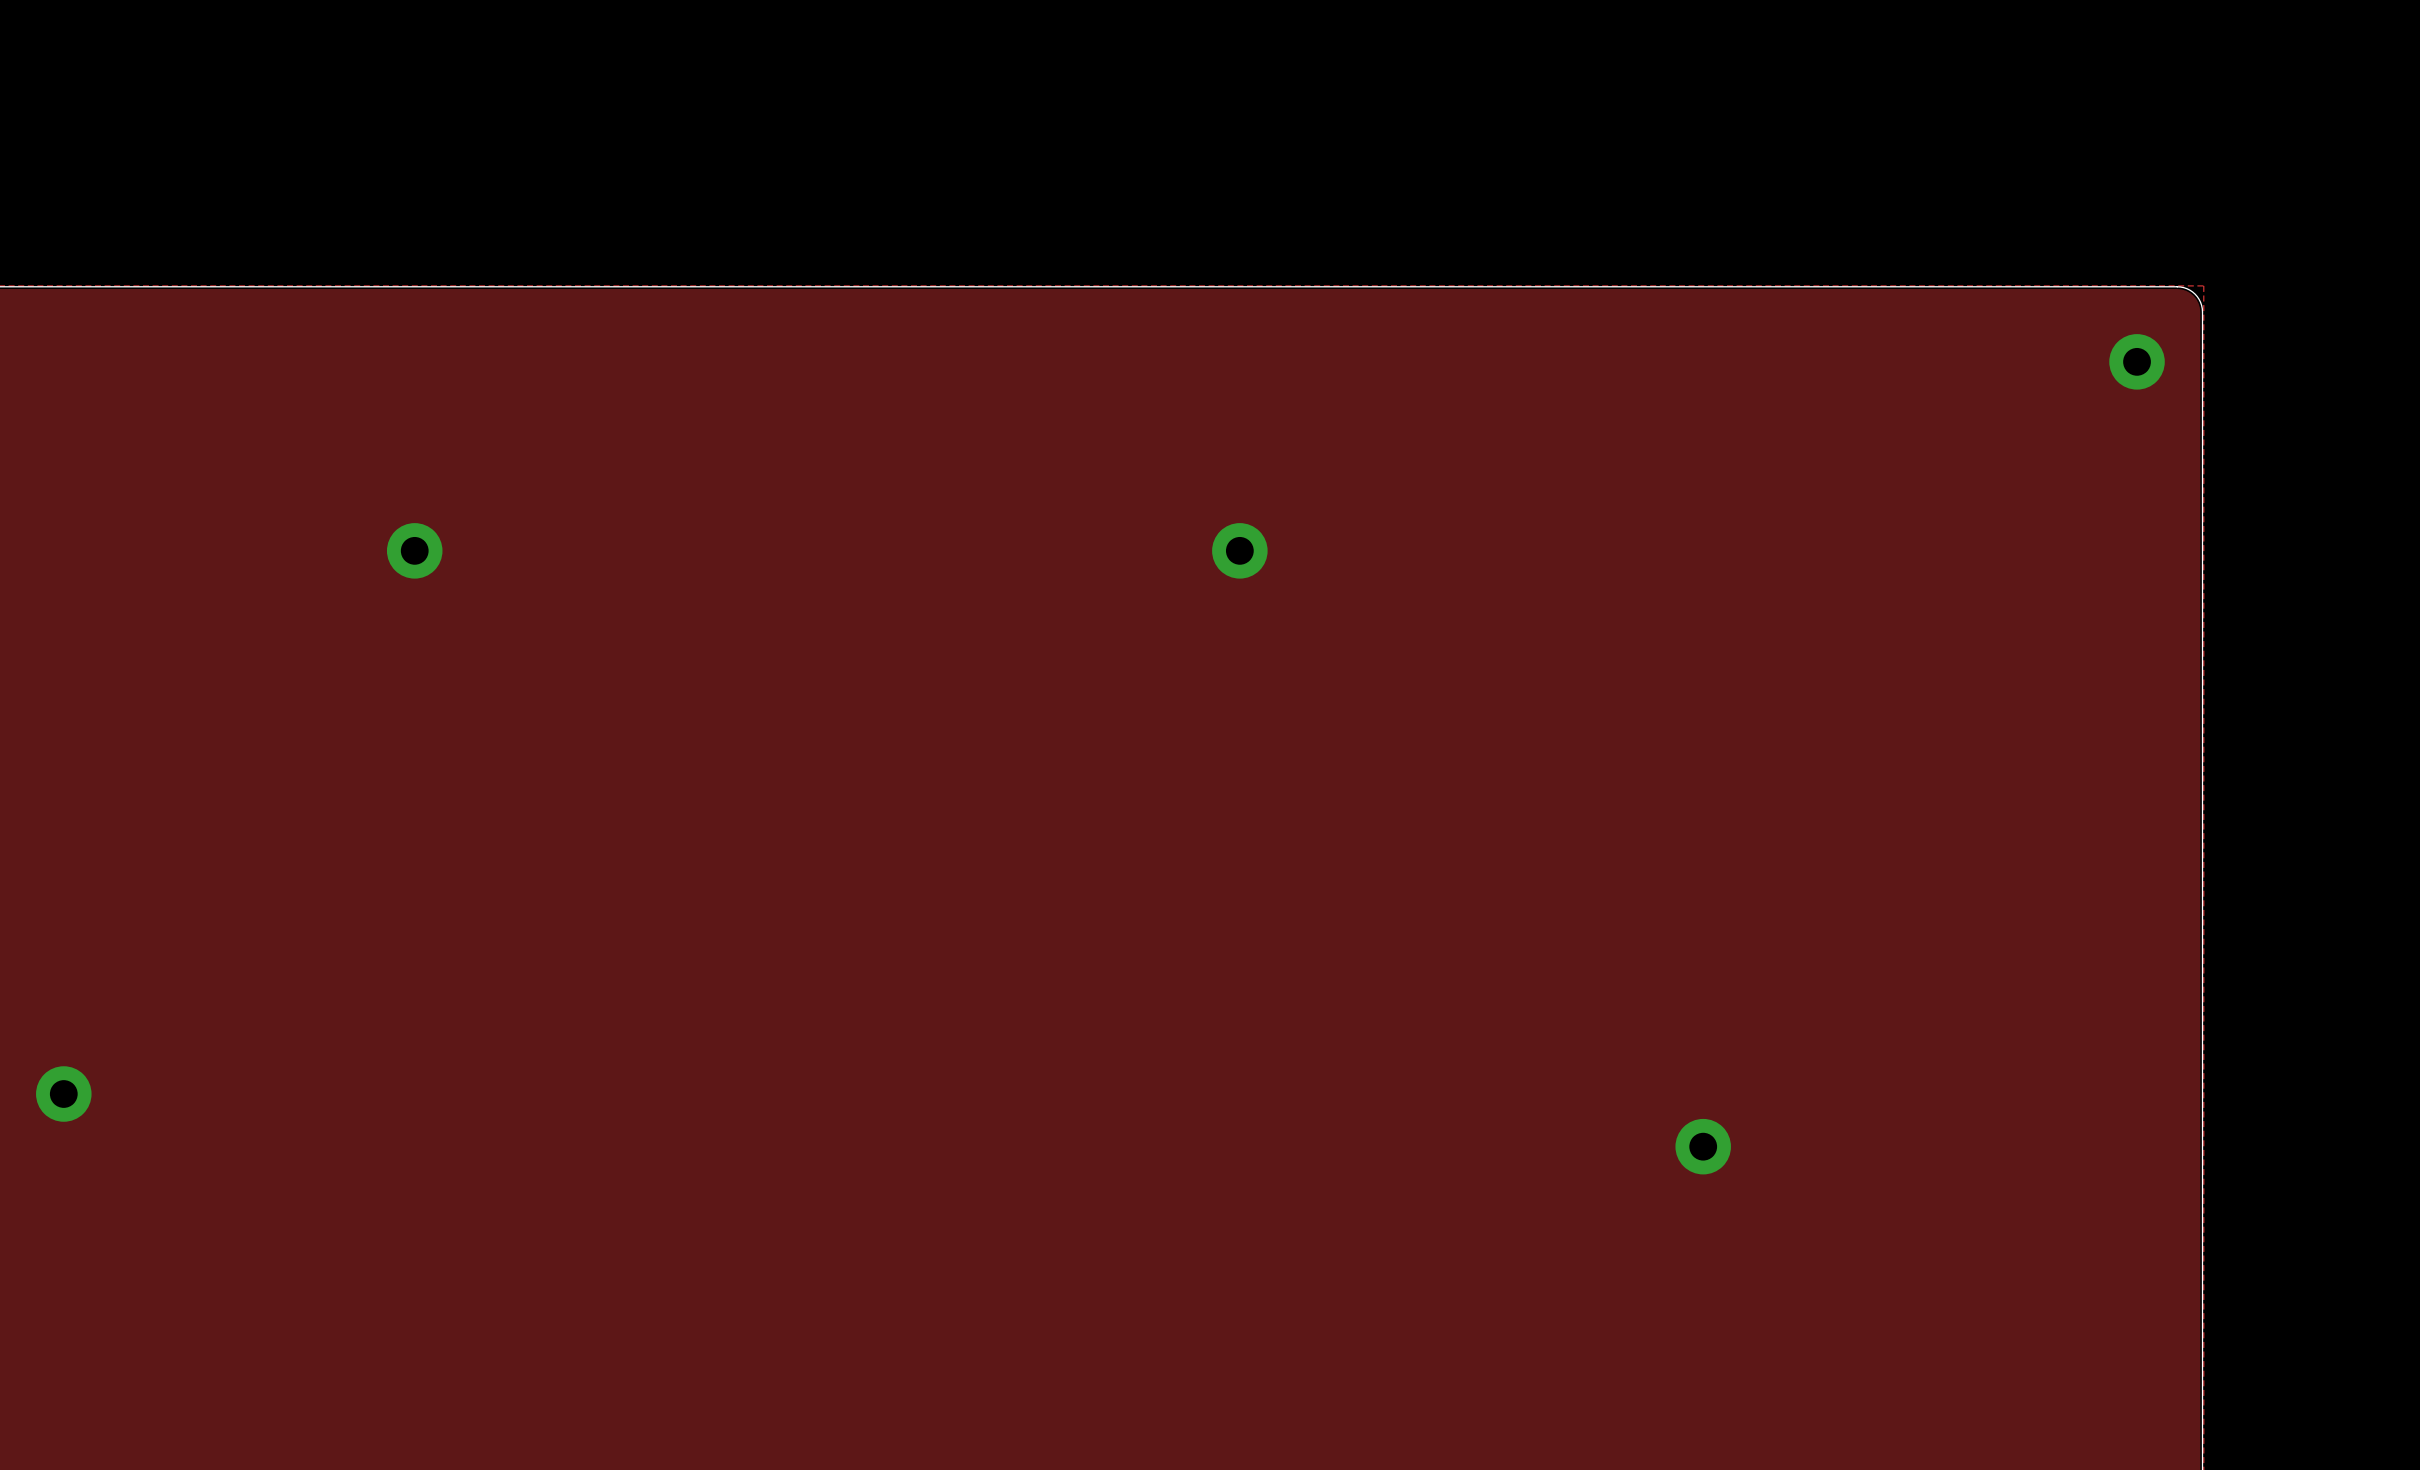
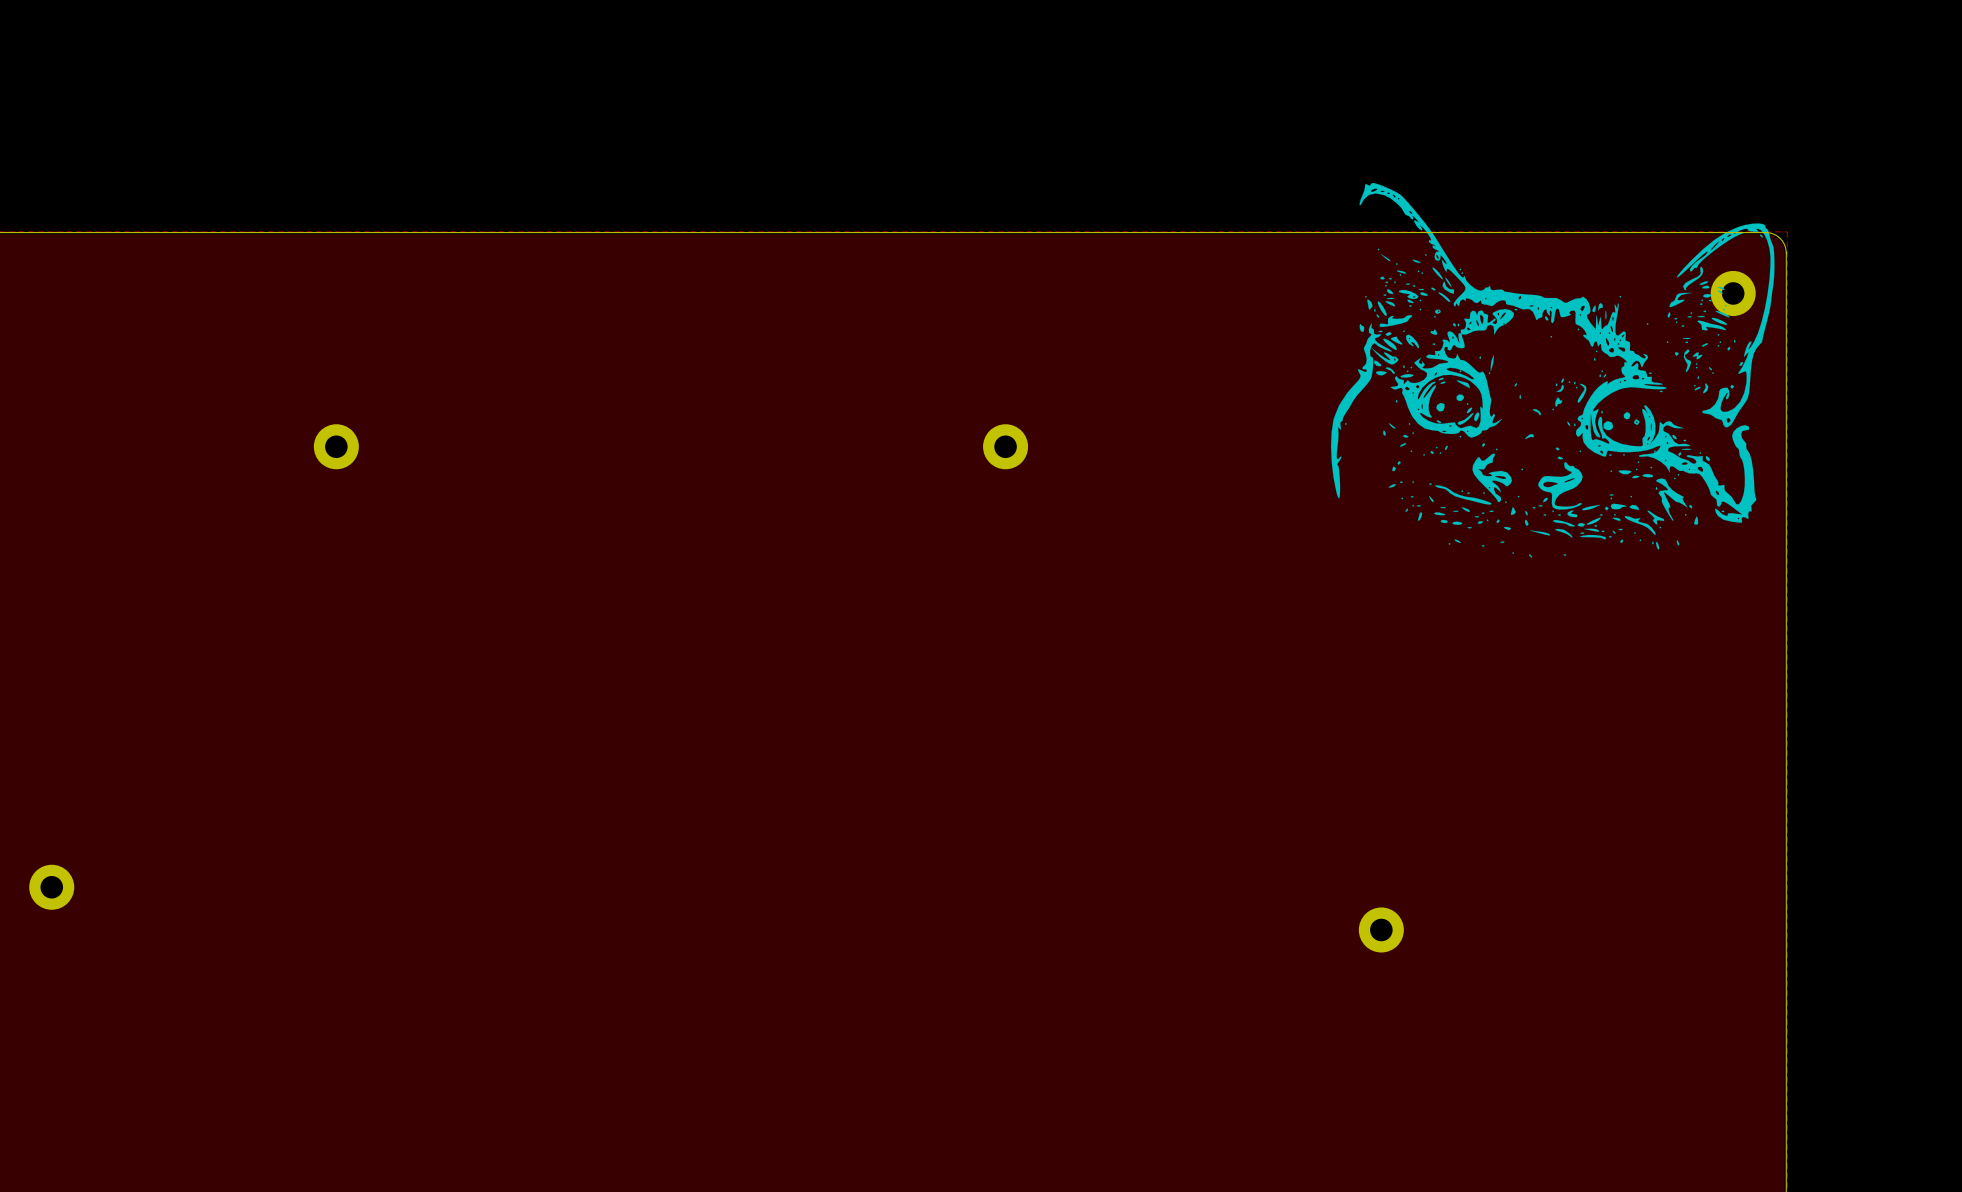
drawing: none -> [1331, 183, 1775, 558]

